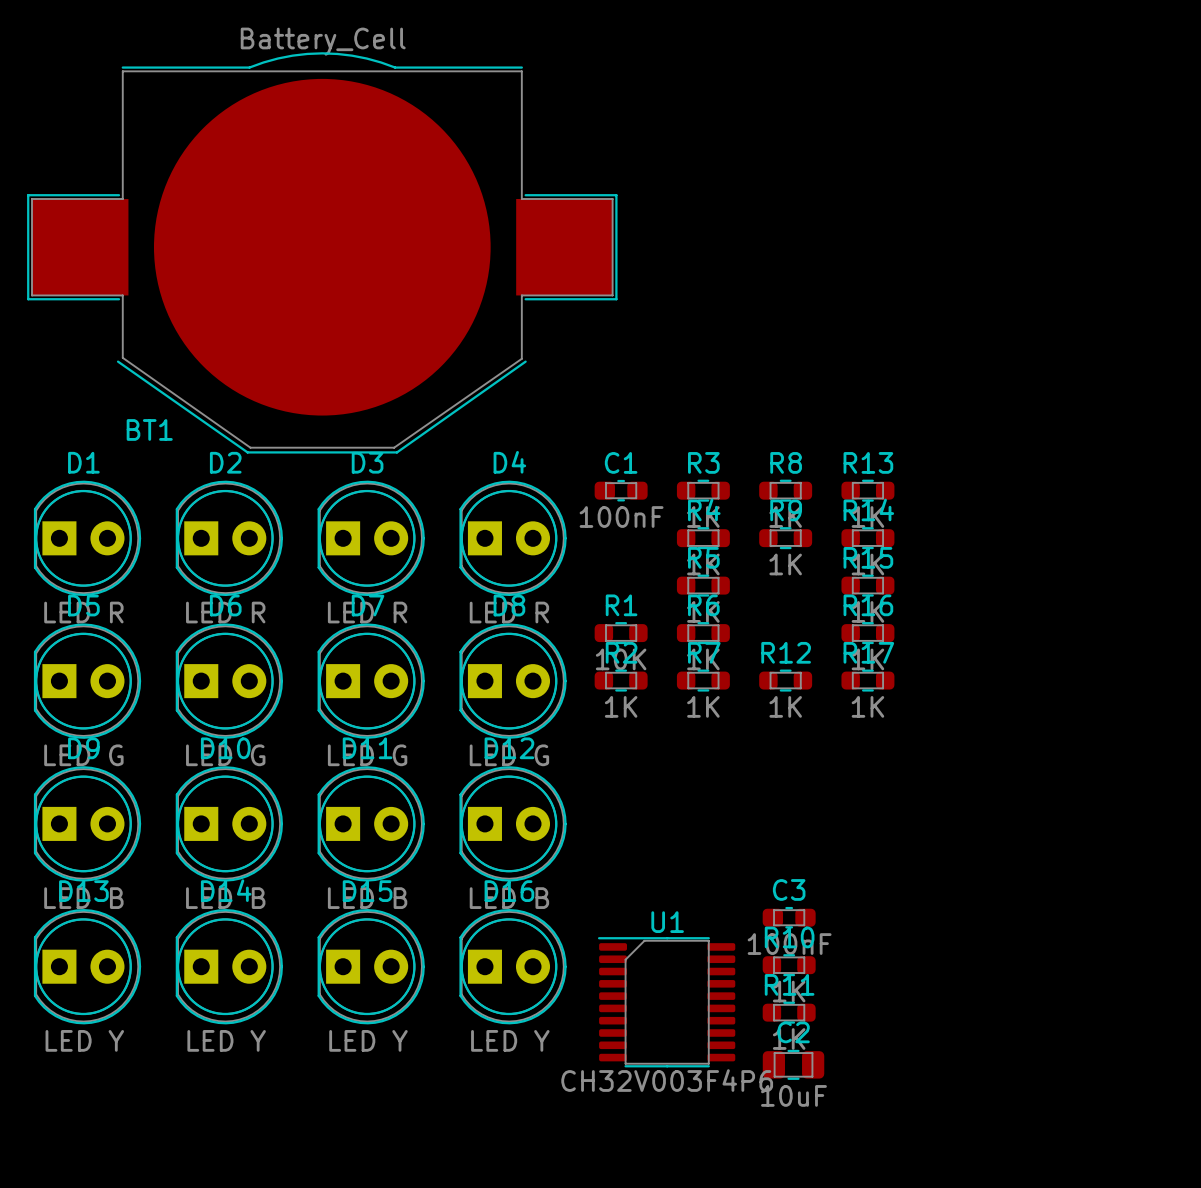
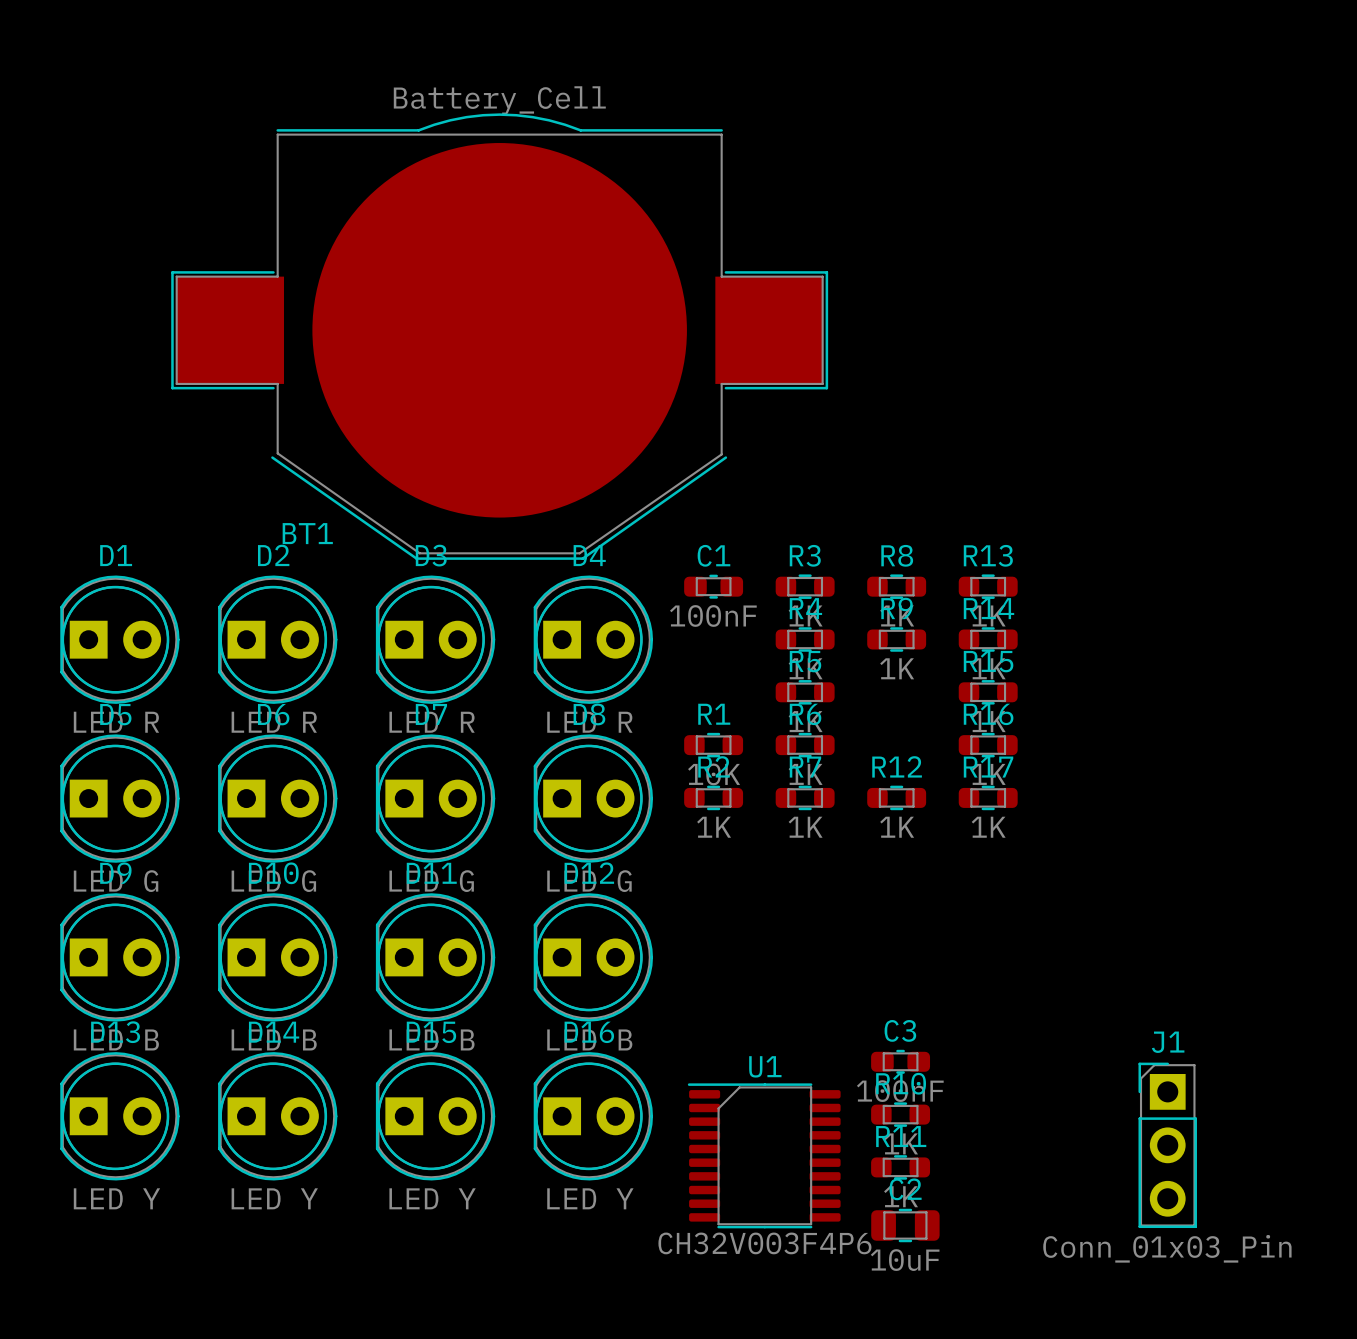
BT1 position: (322, 252) -> (499, 336)
J1: none -> Conn_01x03_Pin (1167, 1145)

